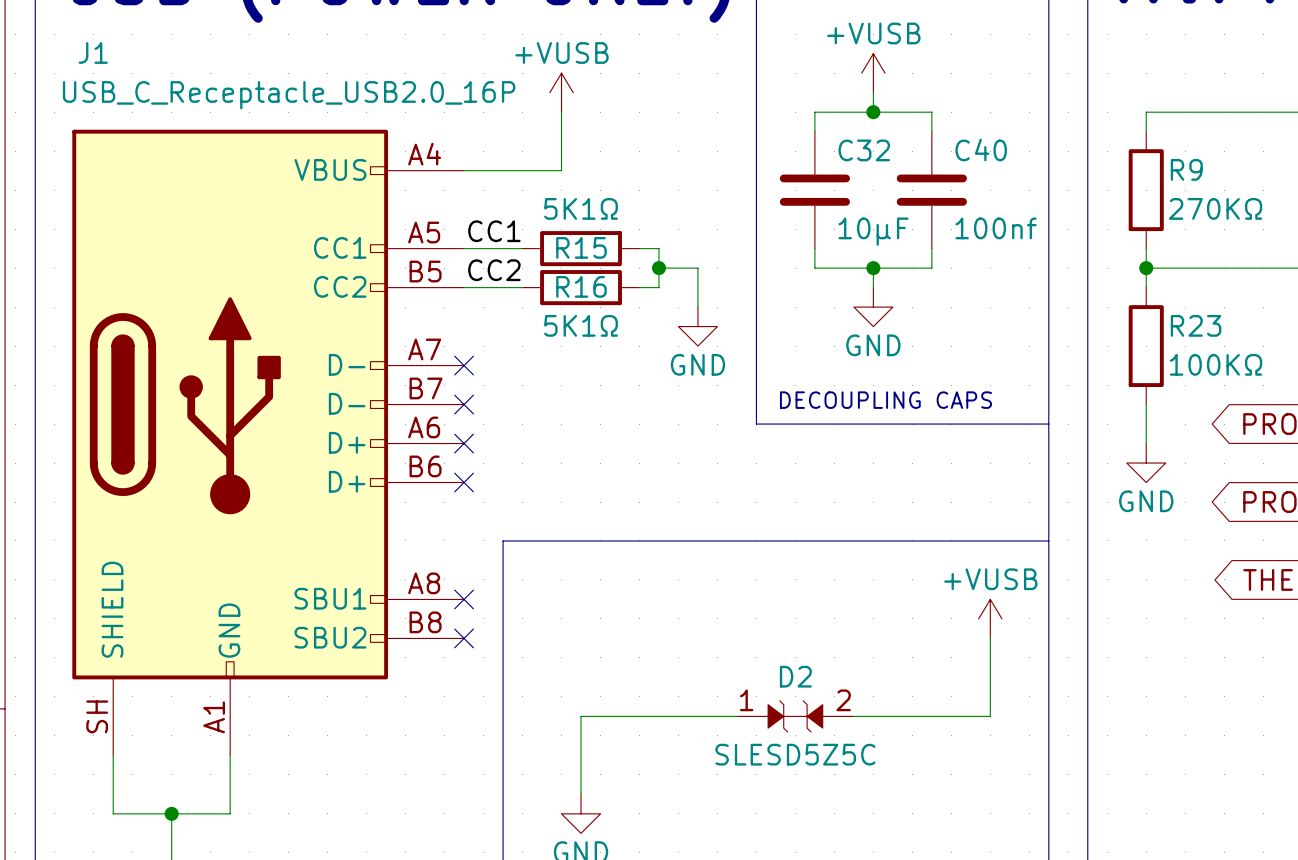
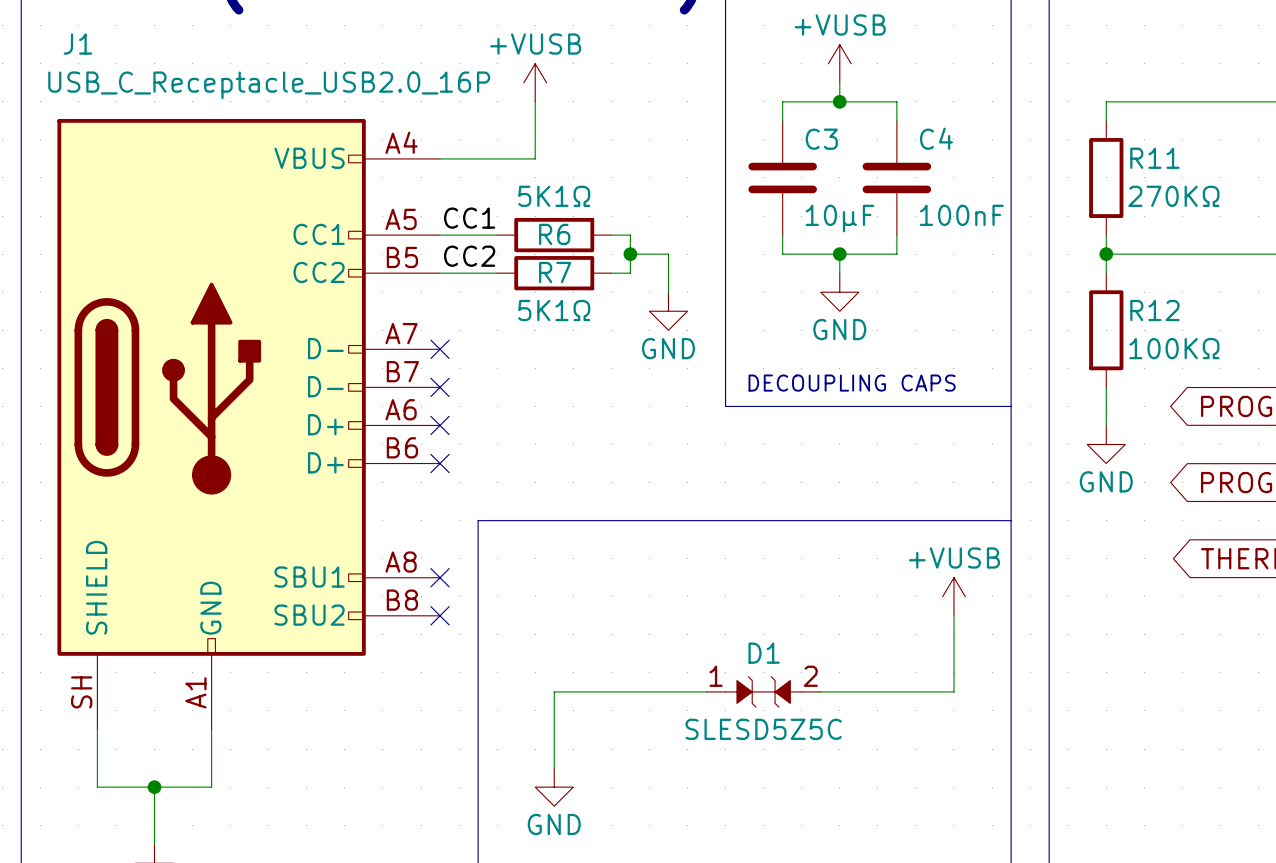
C40 name: C40 (981, 149) -> C4 (936, 138)
C32 name: C32 (864, 150) -> C3 (821, 139)
R9 name: R9 (1186, 169) -> R11 (1154, 158)
C40 value: 100nf (996, 228) -> 100nF (961, 215)
R15 name: R15 (581, 247) -> R6 (554, 234)
R16 name: R16 (581, 286) -> R7 (555, 272)
R23 name: R23 (1196, 325) -> R12 (1154, 310)
D2 name: D2 (795, 676) -> D1 (764, 653)

